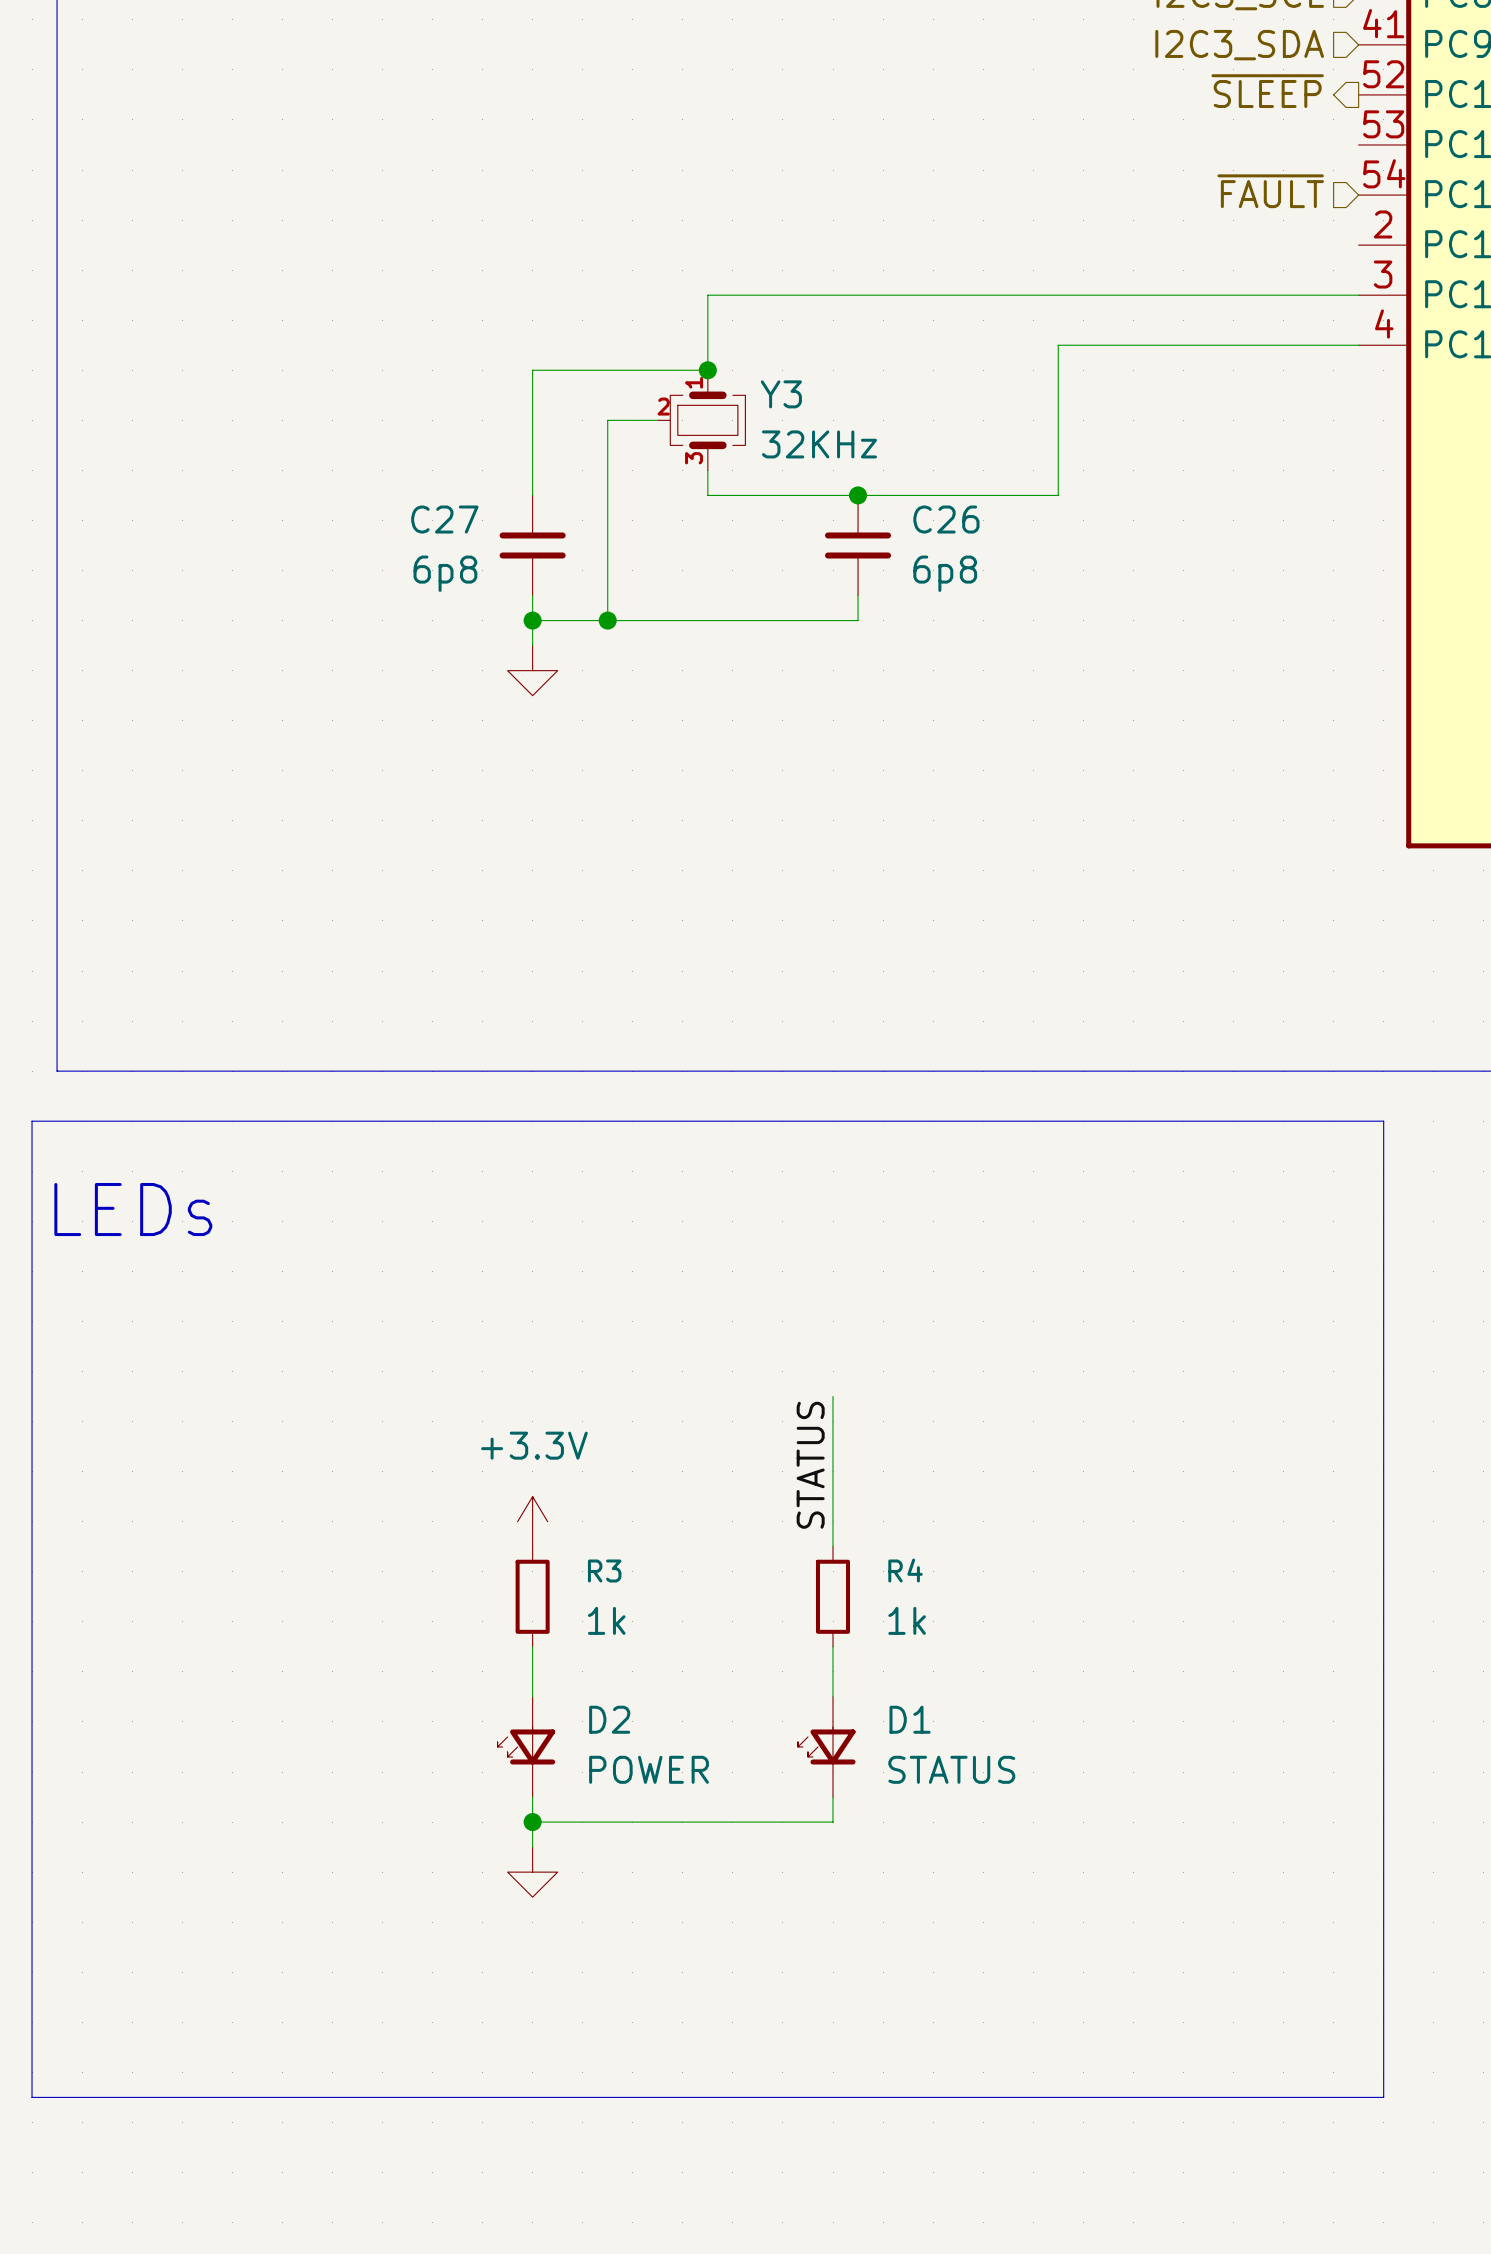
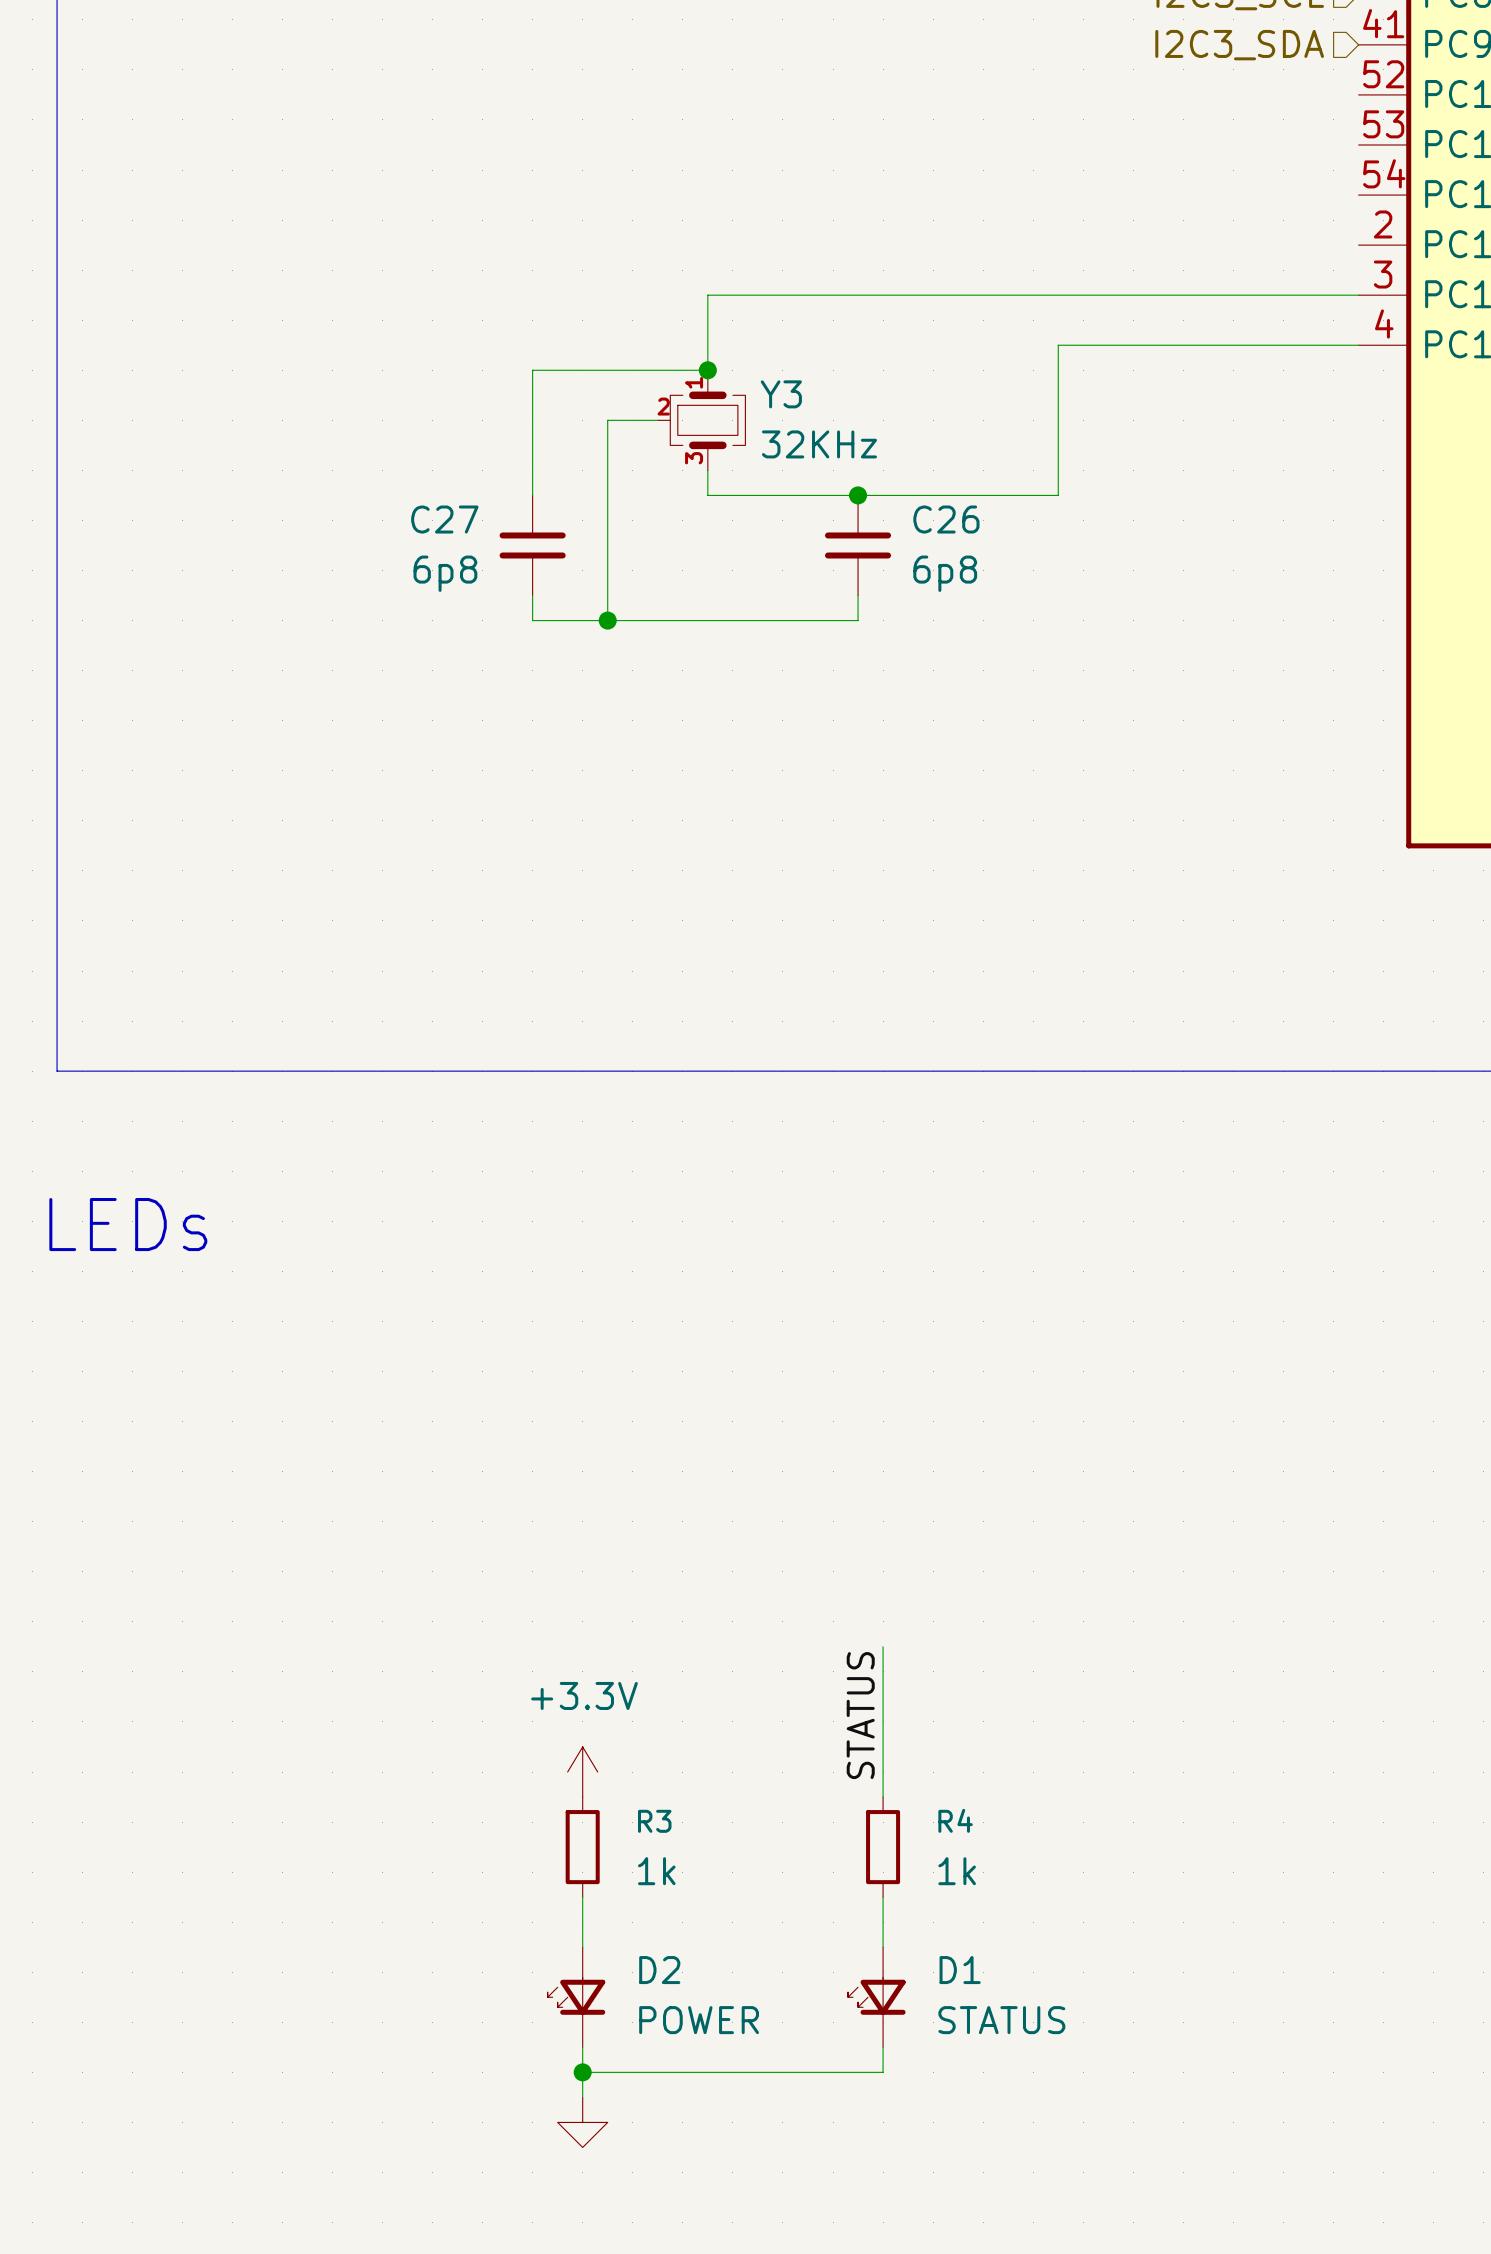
hierarchical label: ~{SLEEP} (1267, 91) -> none
hierarchical label: ~{FAULT} (1270, 191) -> none
wire: (532, 620) (532, 645) -> none
junction: (532, 620) -> none
power symbol: (532, 670) -> none
line: (32, 1121) (1383, 1121) (1383, 2097) (32, 2097) (32, 1121) -> none
text position: LEDs (133, 1209) -> LEDs (128, 1224)
wire: (833, 1396) (833, 1546) -> (883, 1646) (883, 1797)
label position: STATUS (810, 1465) -> STATUS (860, 1715)
power symbol position: +3.3V (532, 1521) -> +3.3V (582, 1772)
R3 position: (532, 1596) -> (582, 1847)
R4 position: (833, 1596) -> (883, 1847)
wire: (532, 1646) (532, 1696) -> (582, 1897) (582, 1947)
wire: (833, 1646) (833, 1696) -> (883, 1897) (883, 1947)
D2 position: (526, 1746) -> (576, 1997)
D1 position: (826, 1746) -> (876, 1997)
wire: (532, 1797) (532, 1847) -> (582, 2047) (582, 2097)
wire: (833, 1797) (833, 1822) (532, 1822) -> (883, 2047) (883, 2072) (582, 2072)
junction: (532, 1822) -> none
power symbol position: (532, 1872) -> (582, 2122)
junction: none -> (582, 2072)

